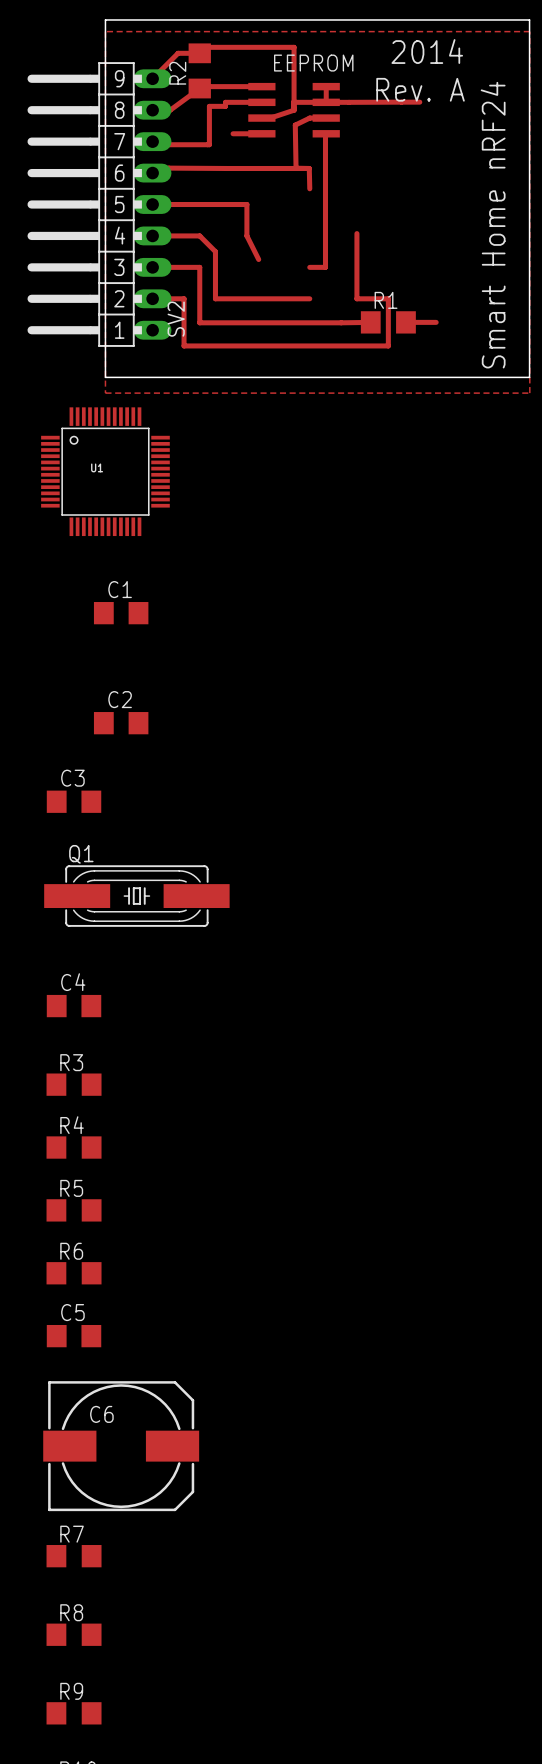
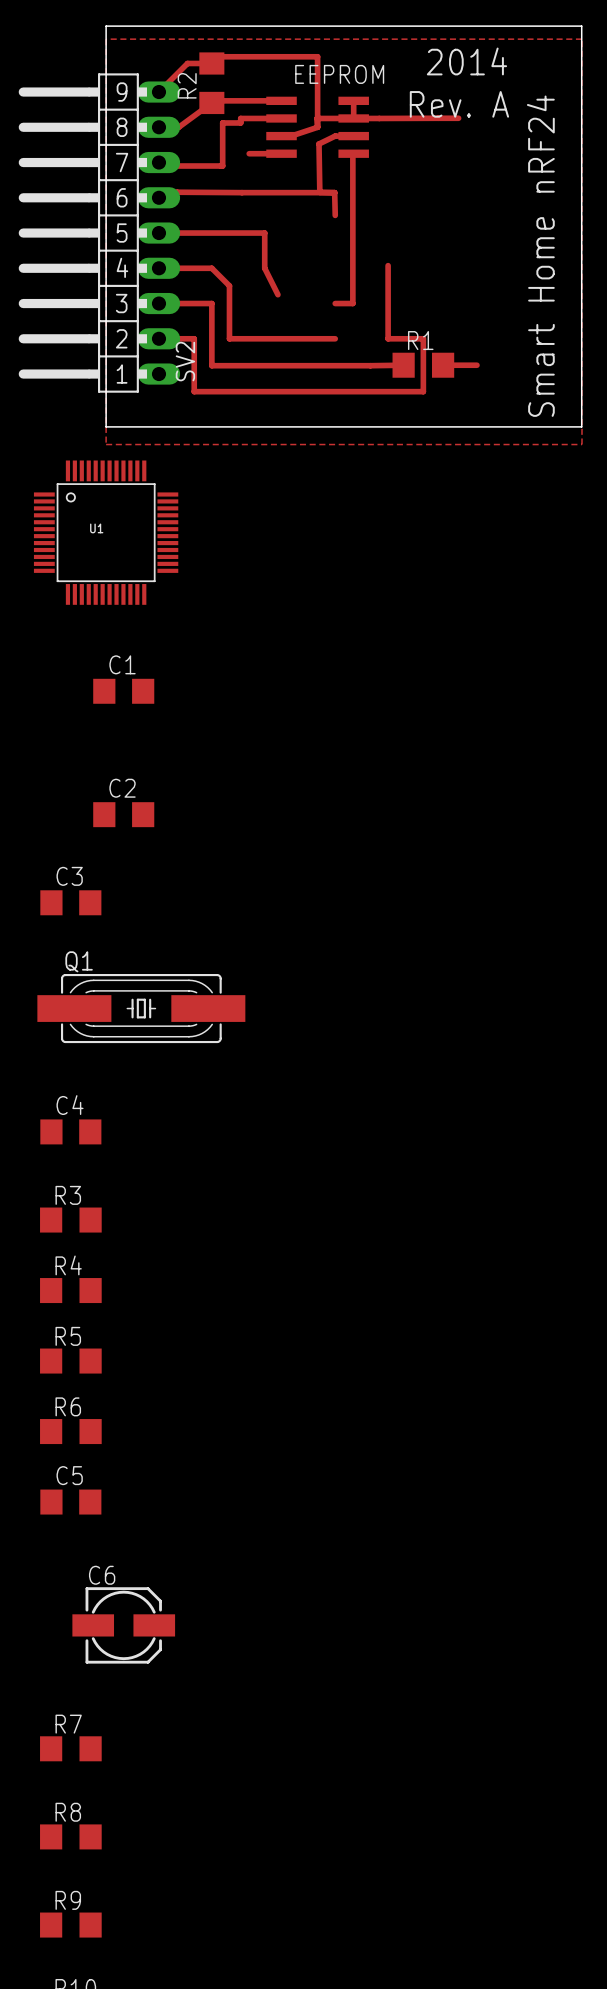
C6 footprint: [43, 1381, 200, 1512] -> [72, 1587, 176, 1664]

